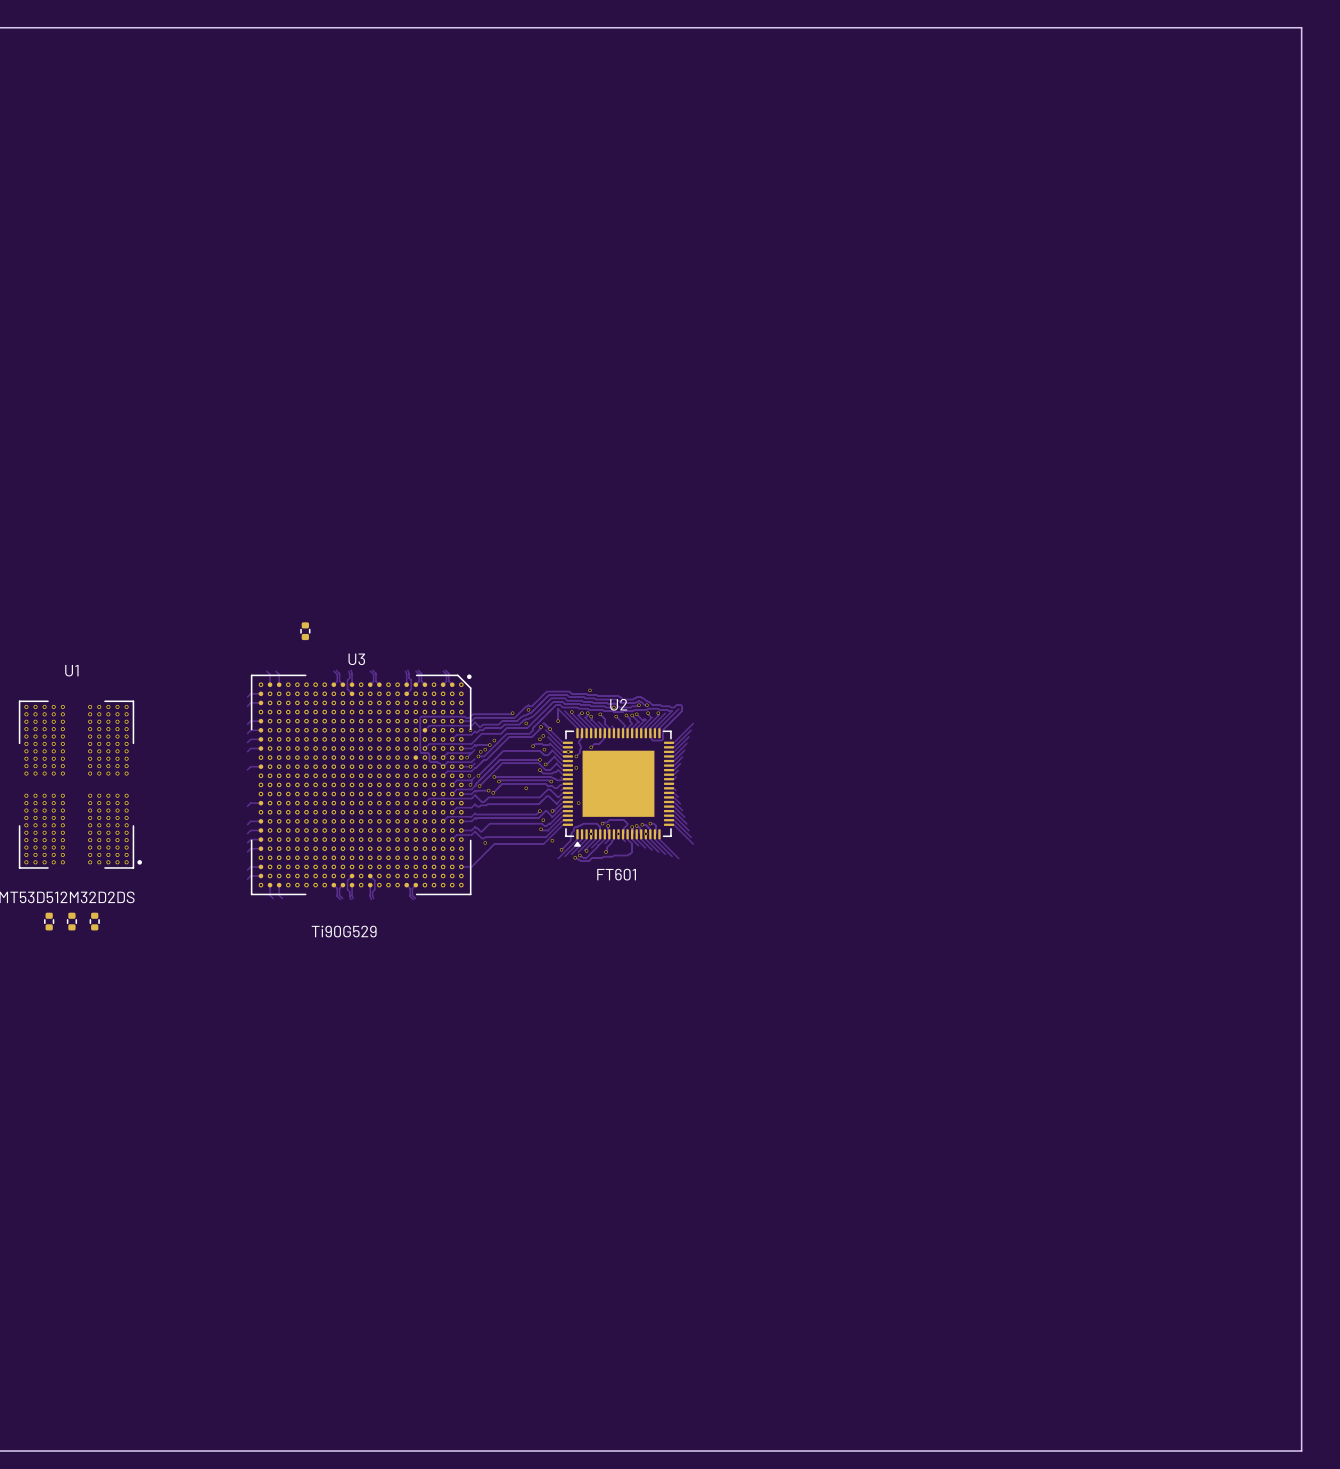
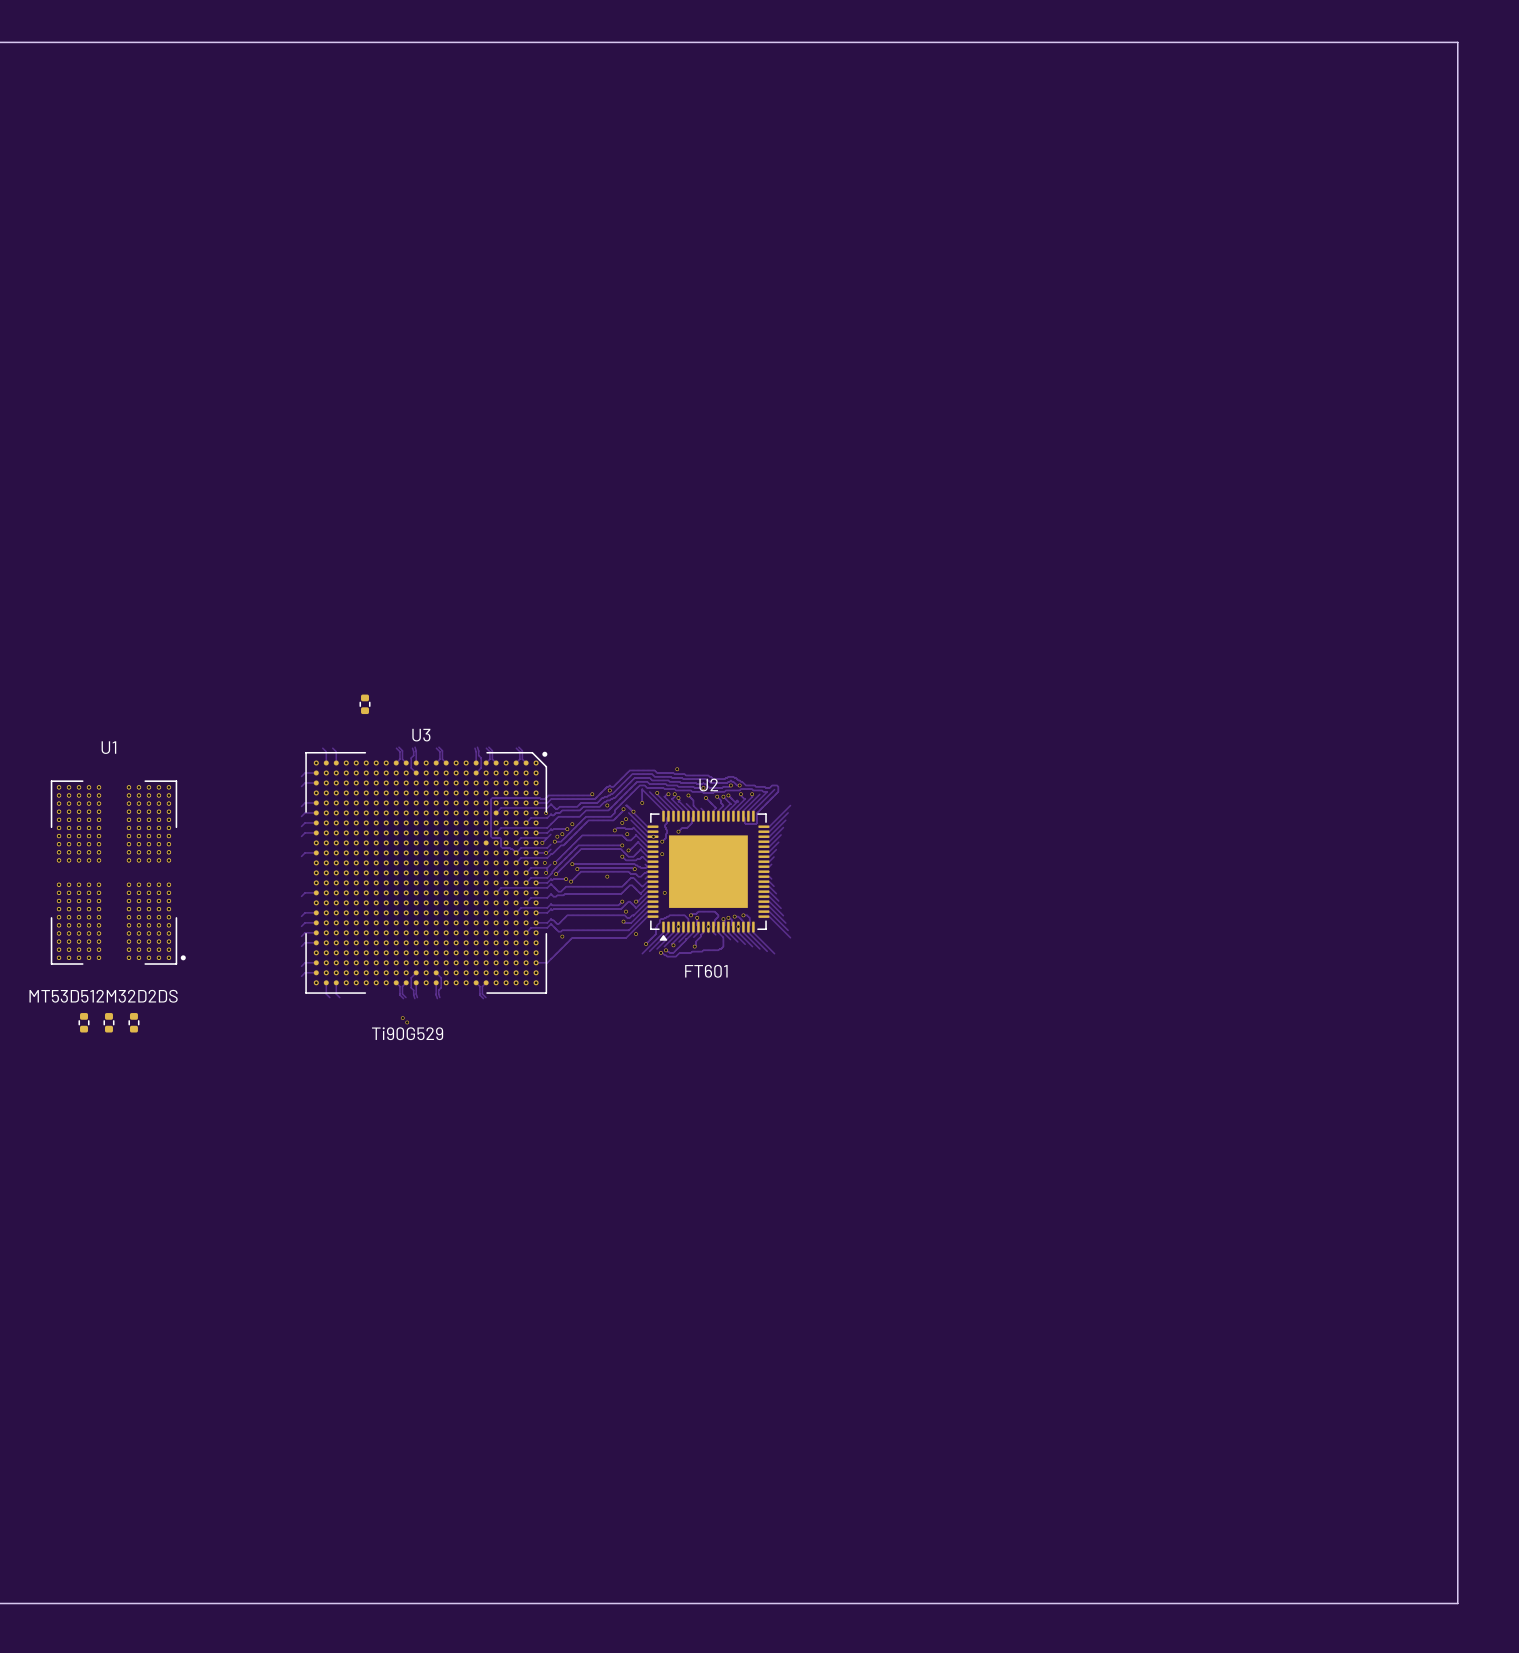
via: none -> (402, 1018)
via: none -> (407, 1022)

